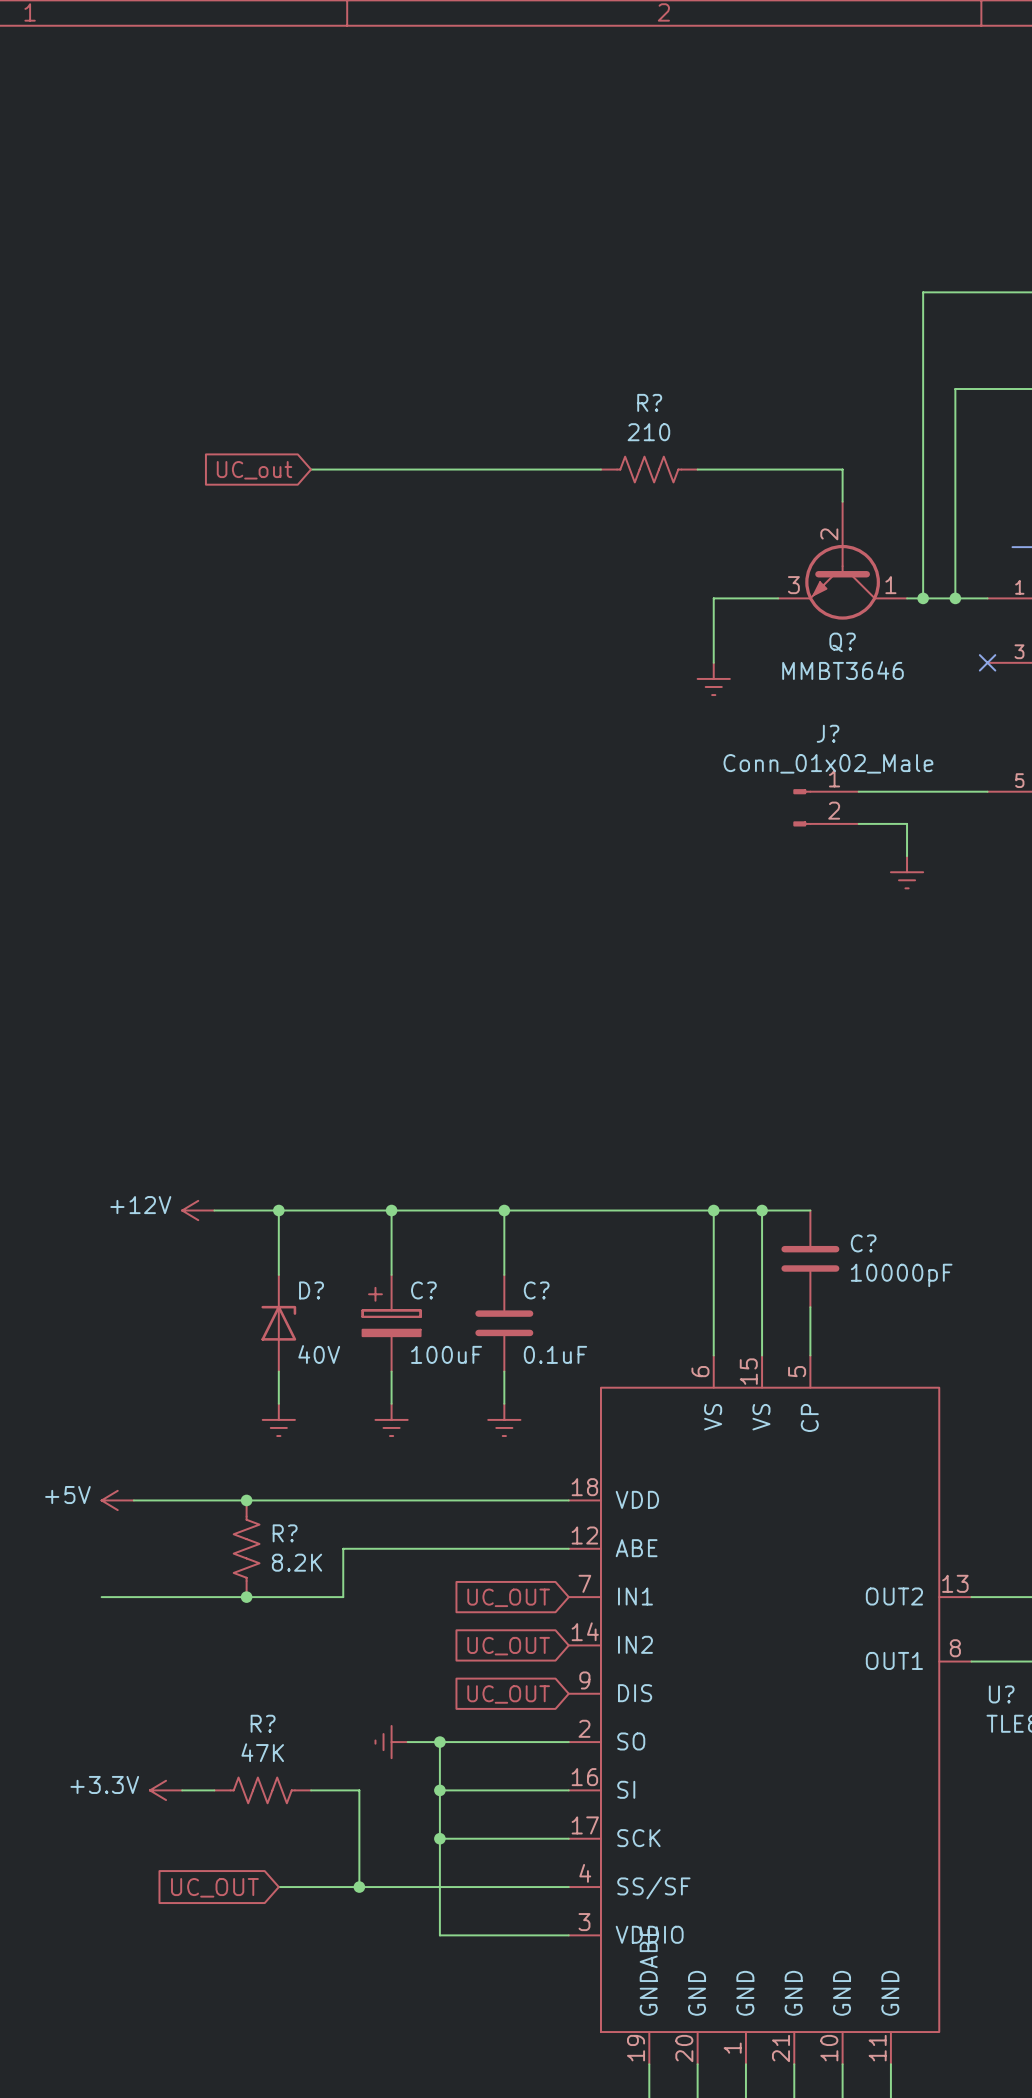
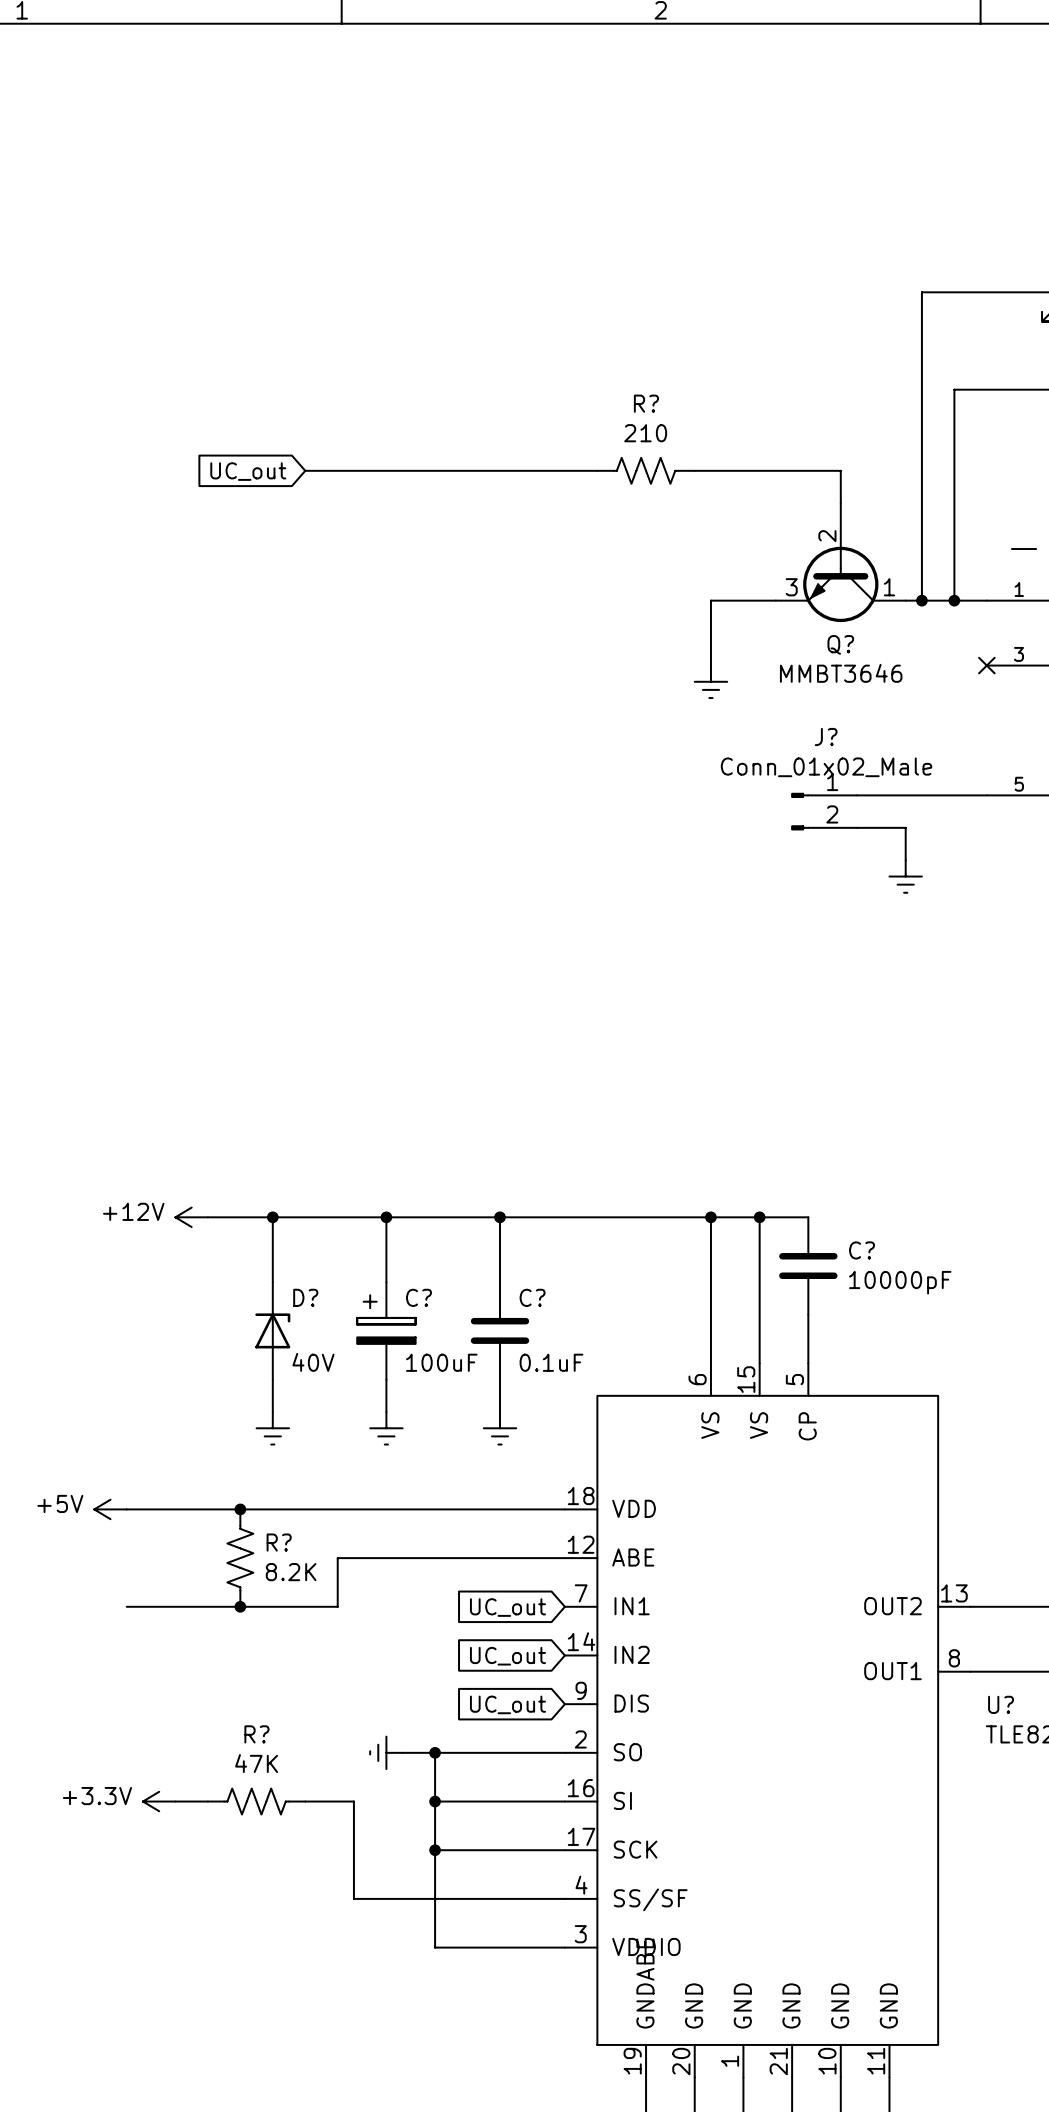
wire: (101, 1597) (133, 1597) -> none
global label: UC_OUT (508, 1597) -> UC_out (507, 1607)
global label: UC_OUT (508, 1646) -> UC_out (507, 1656)
global label: UC_OUT (508, 1694) -> UC_out (507, 1704)
global label: UC_OUT (214, 1887) -> none
wire: (278, 1887) (359, 1887) -> none
junction: (359, 1887) -> none

